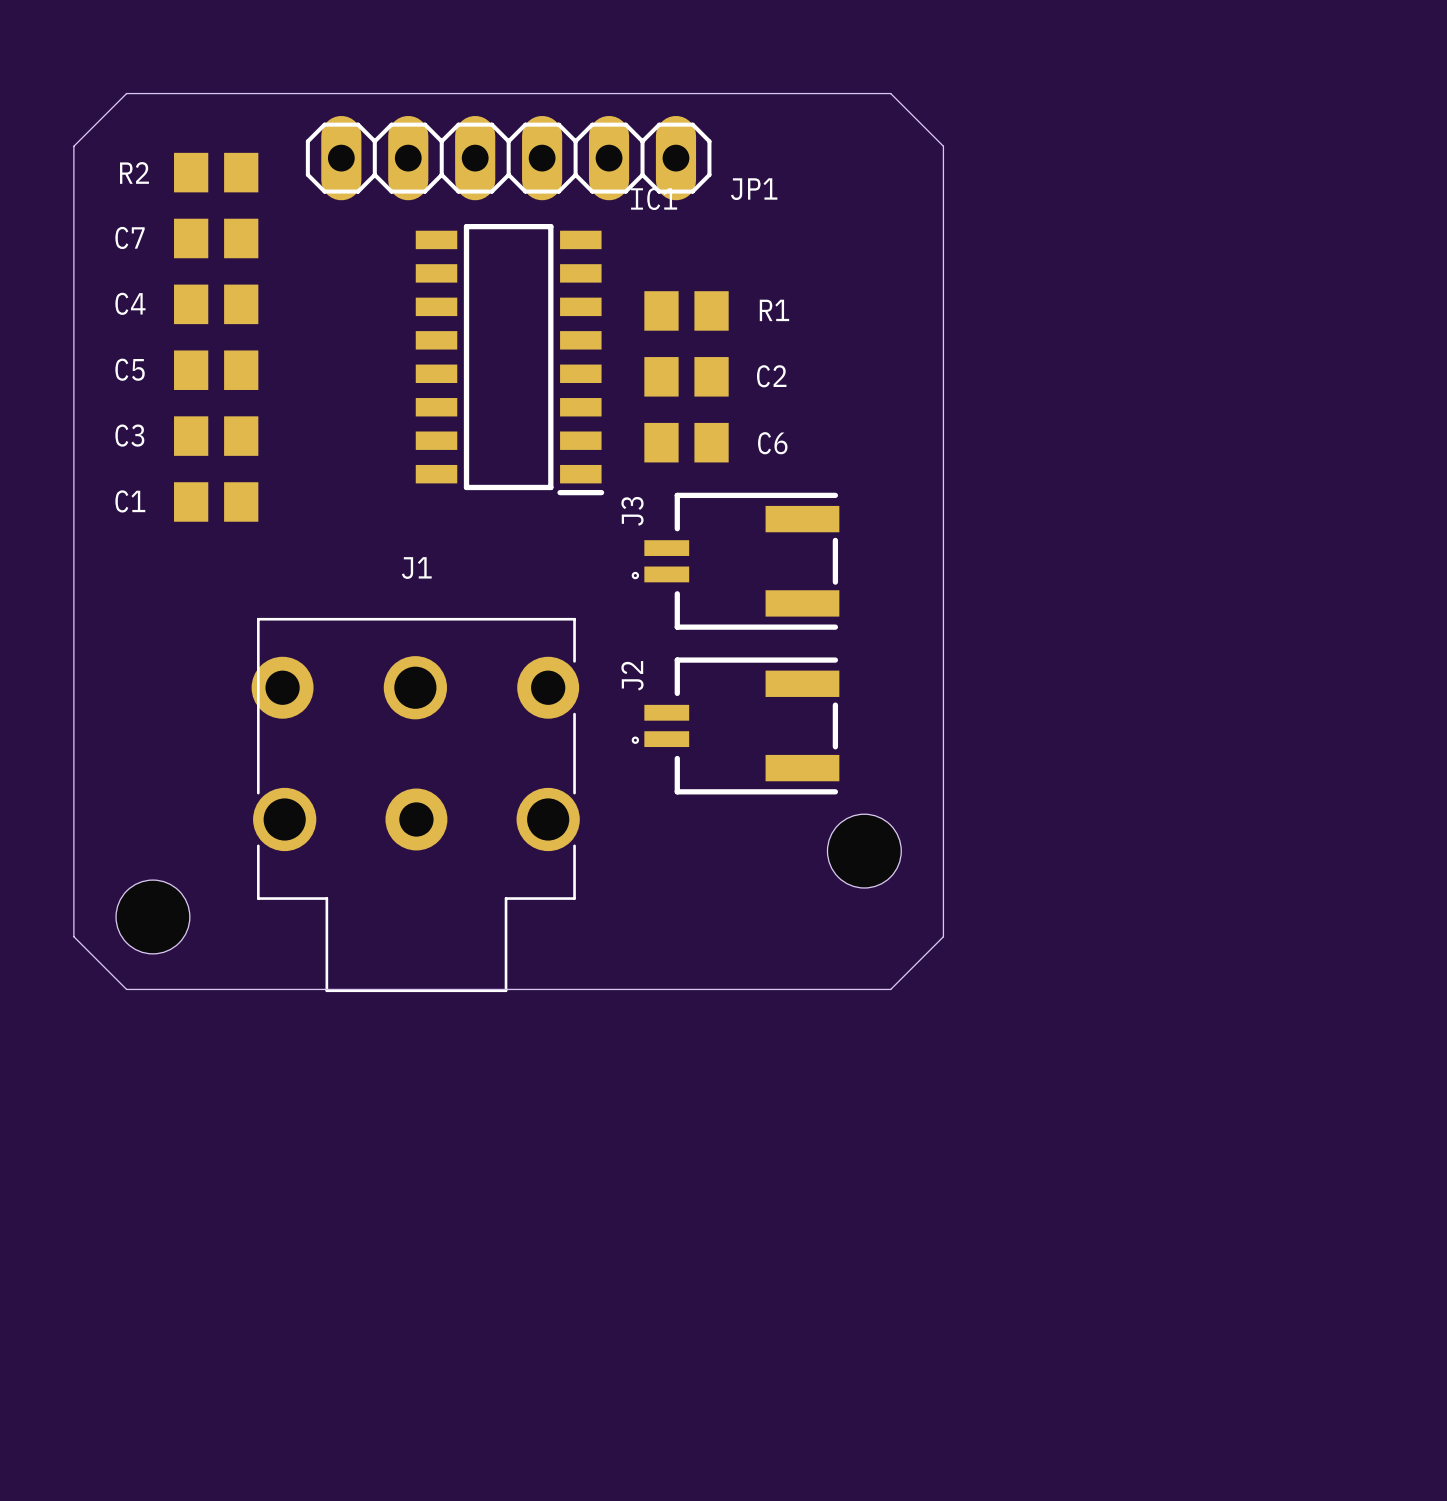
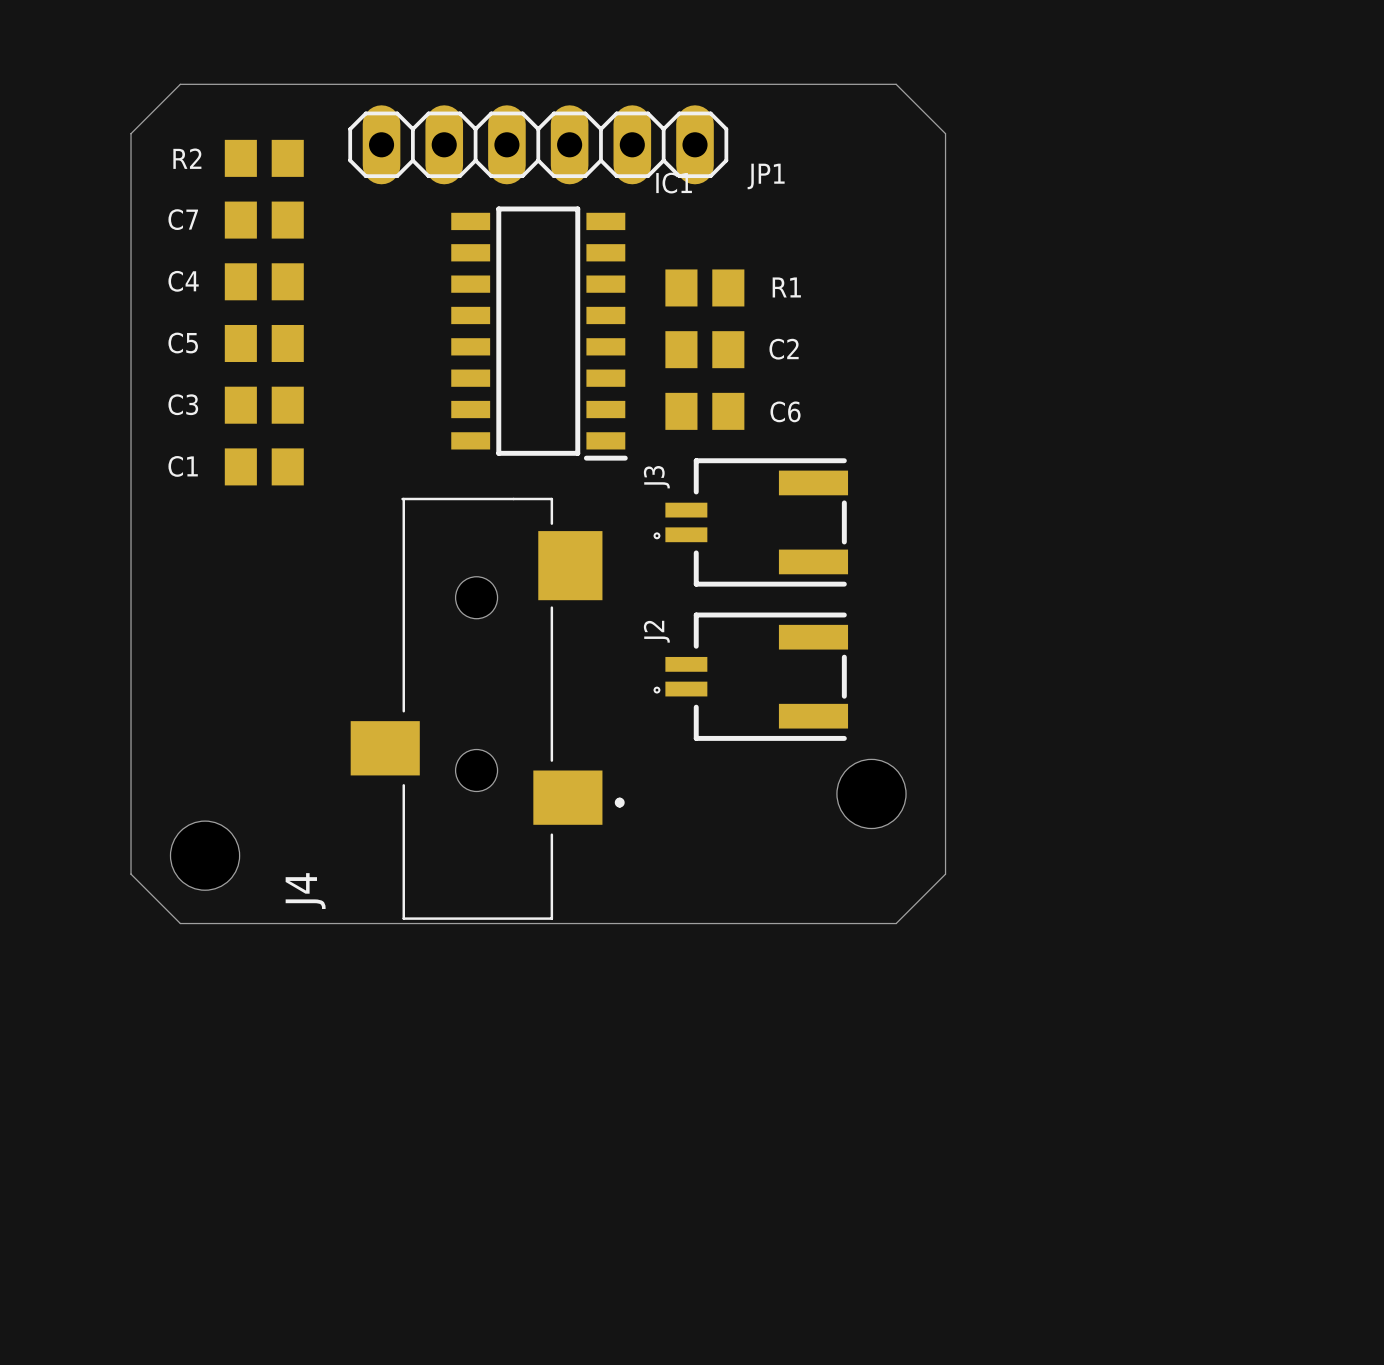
J4: none -> (487, 708)
J1: (415, 804) -> none

